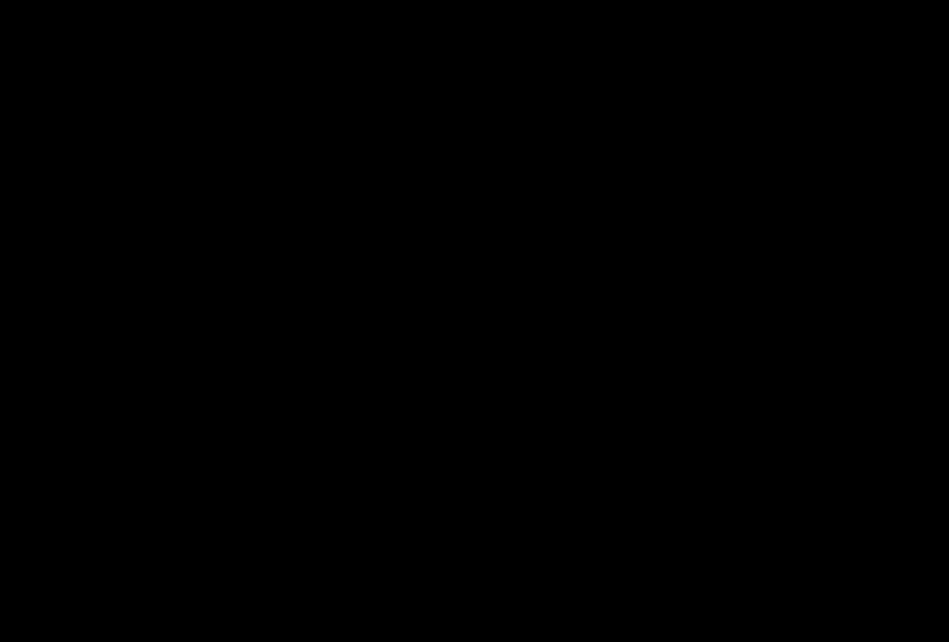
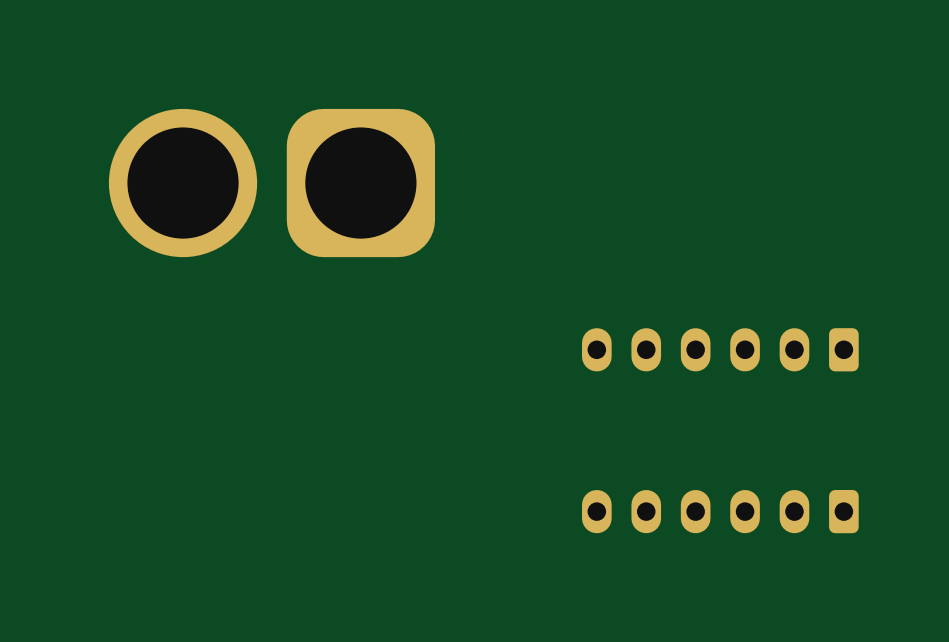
part: none -> (271, 183)
part: none -> (720, 349)
part: none -> (720, 511)

